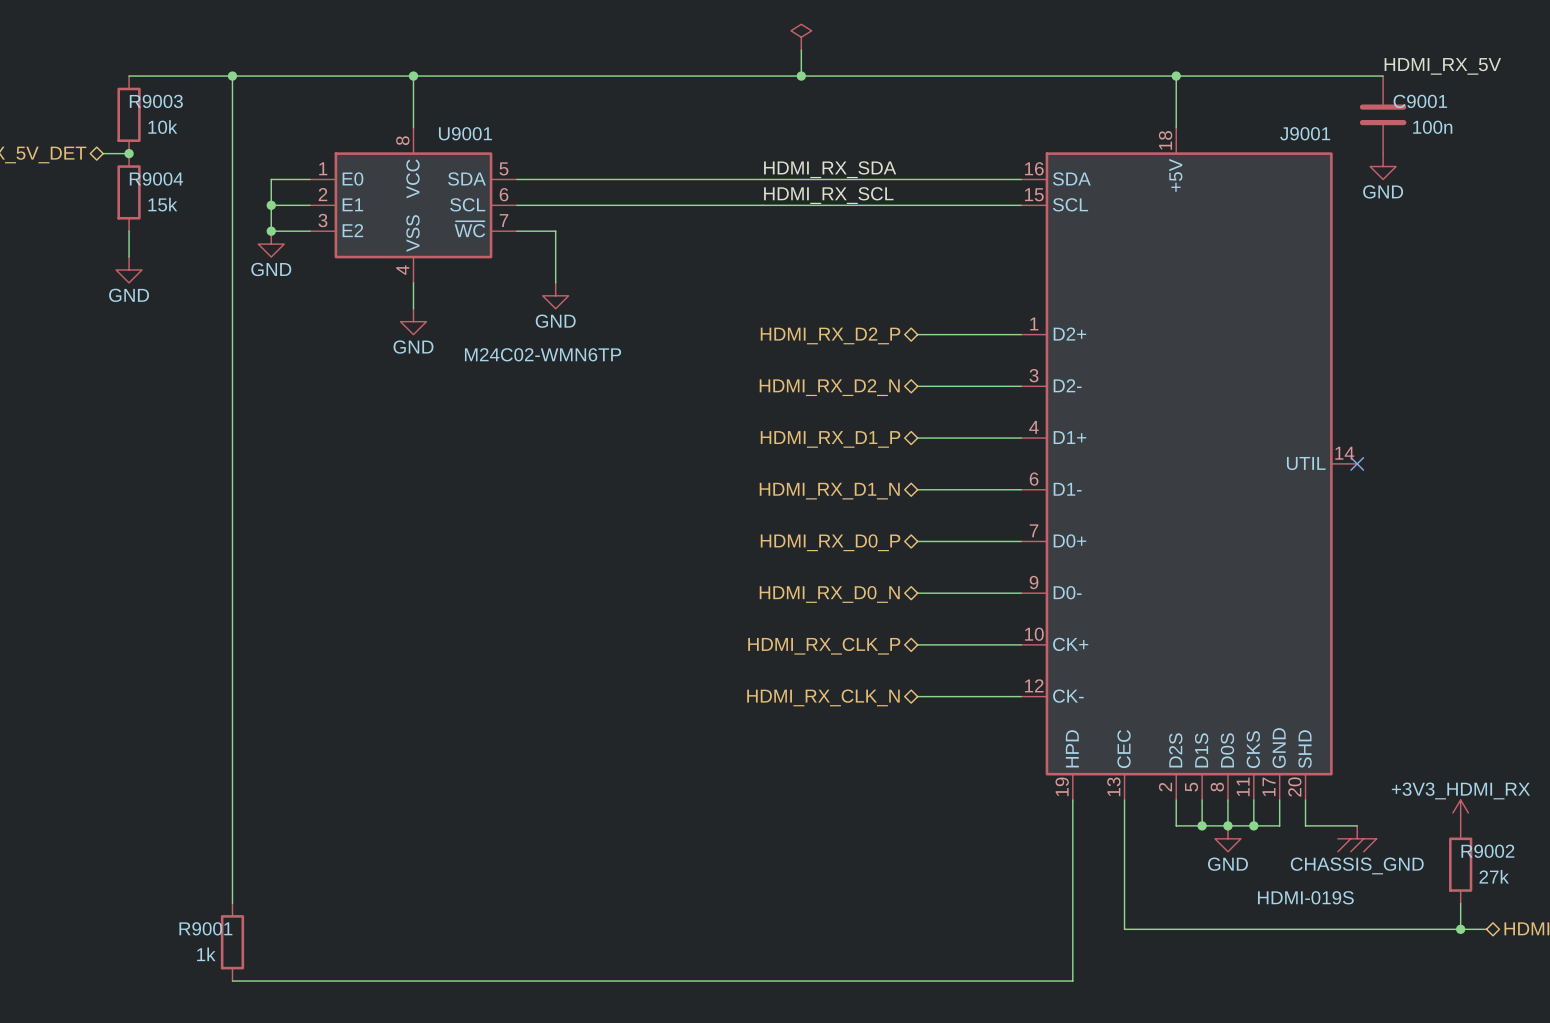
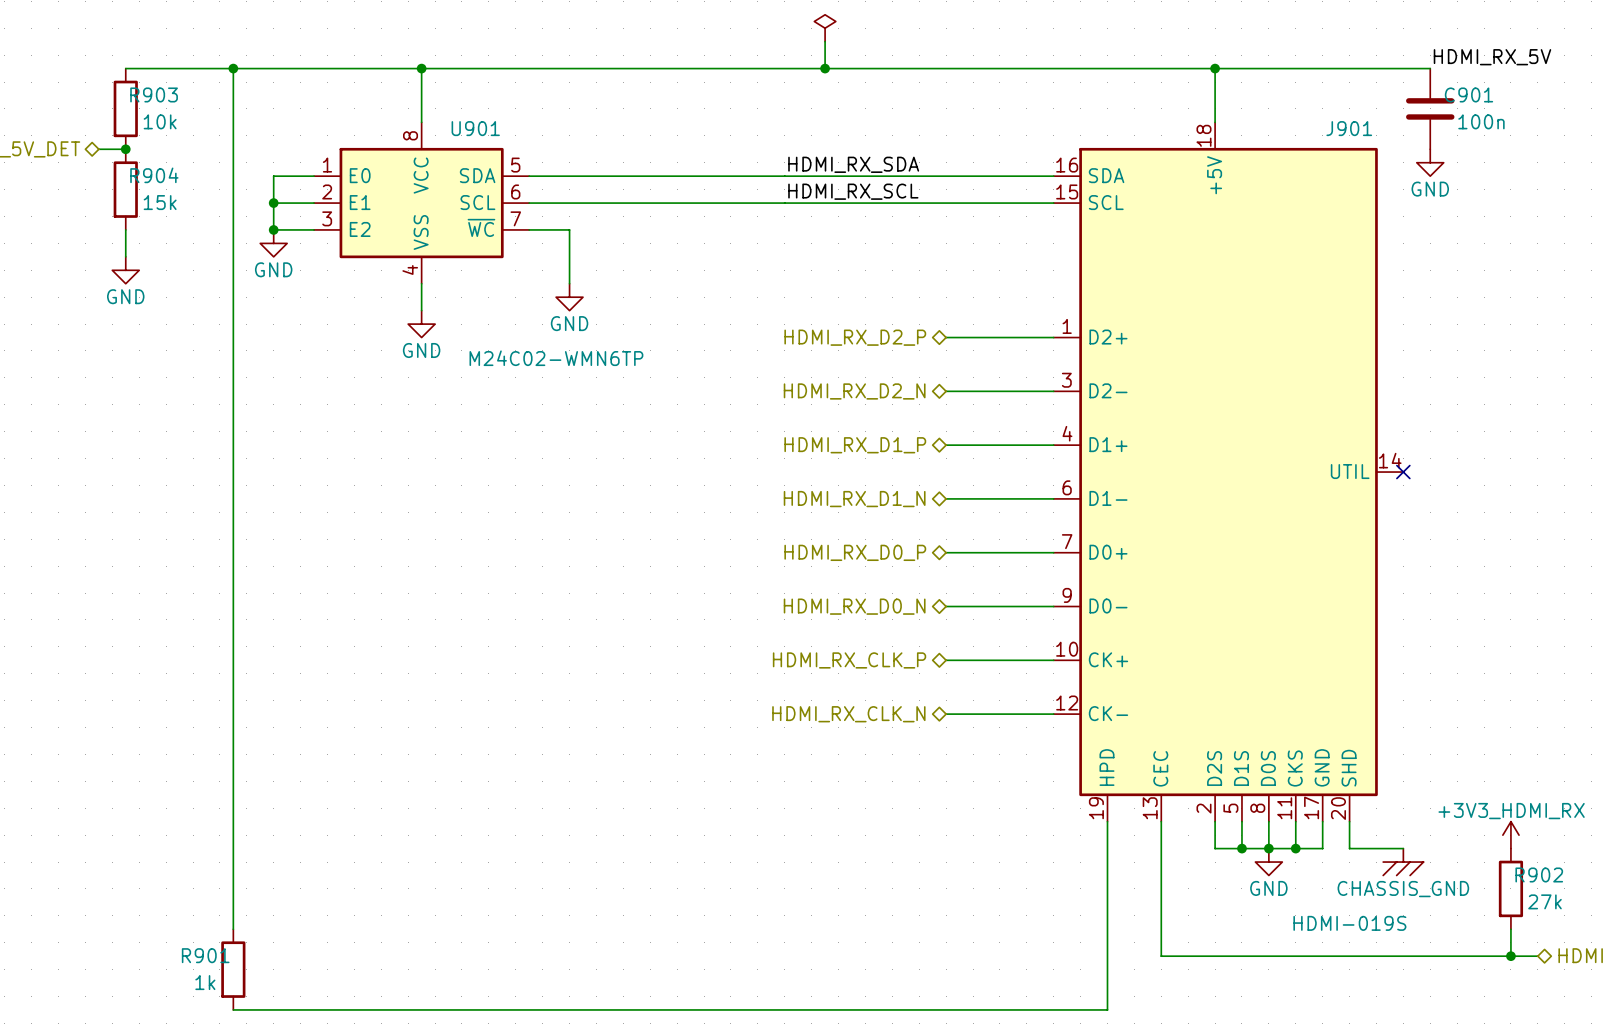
R9003 name: R9003 (156, 101) -> R903 (154, 94)
C9001 name: C9001 (1420, 101) -> C901 (1469, 94)
U9001 name: U9001 (465, 133) -> U901 (475, 128)
J9001 name: J9001 (1305, 133) -> J901 (1349, 128)
R9004 name: R9004 (156, 178) -> R904 (154, 175)
R9002 name: R9002 (1487, 851) -> R902 (1539, 874)
R9001 name: R9001 (205, 928) -> R901 (205, 955)

